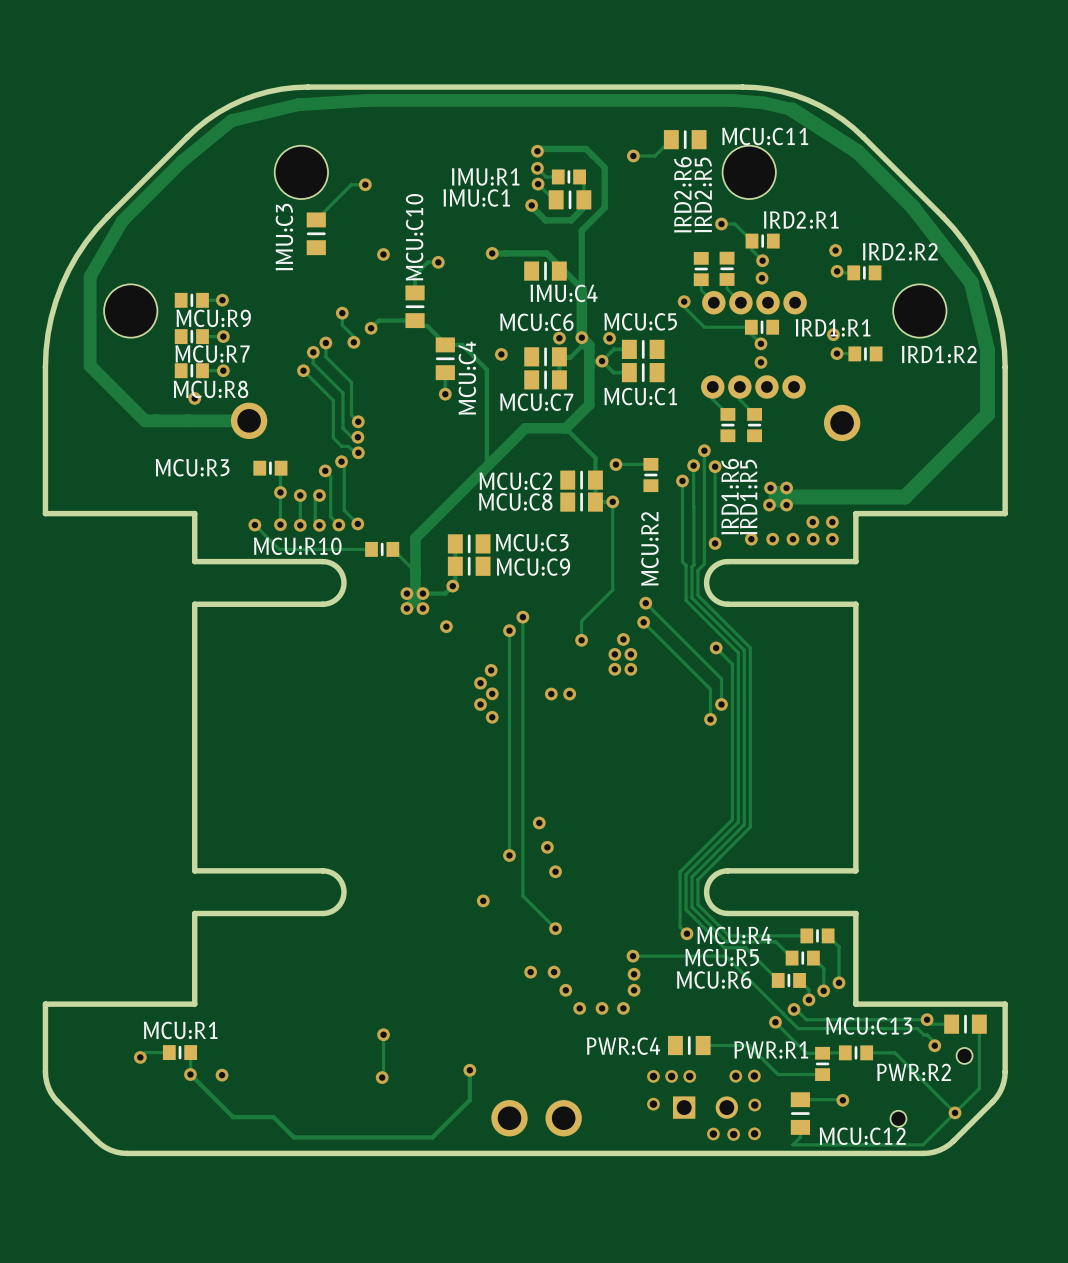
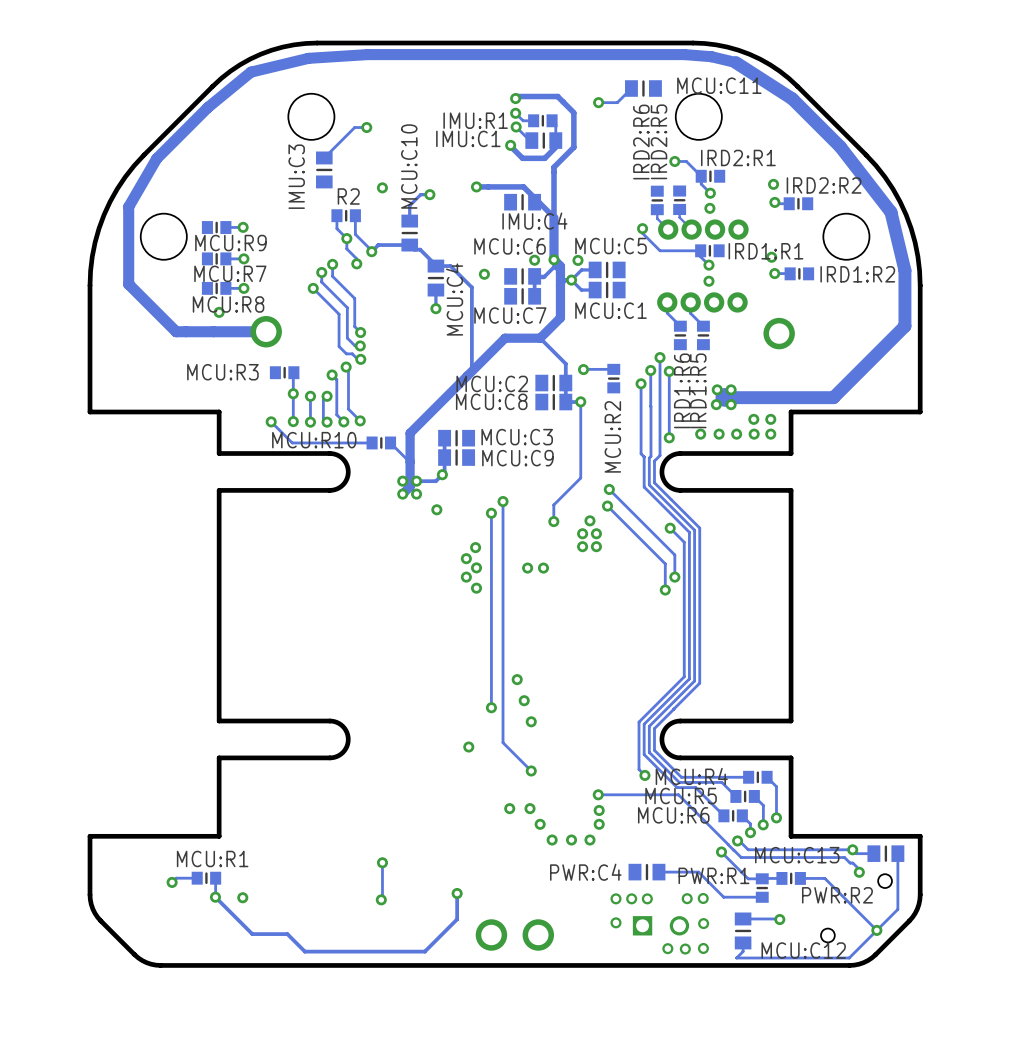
track: none -> (336, 215) (336, 228) (346, 238)
R2: none -> (346, 215)
track: none -> (355, 215) (355, 234) (371, 251)

